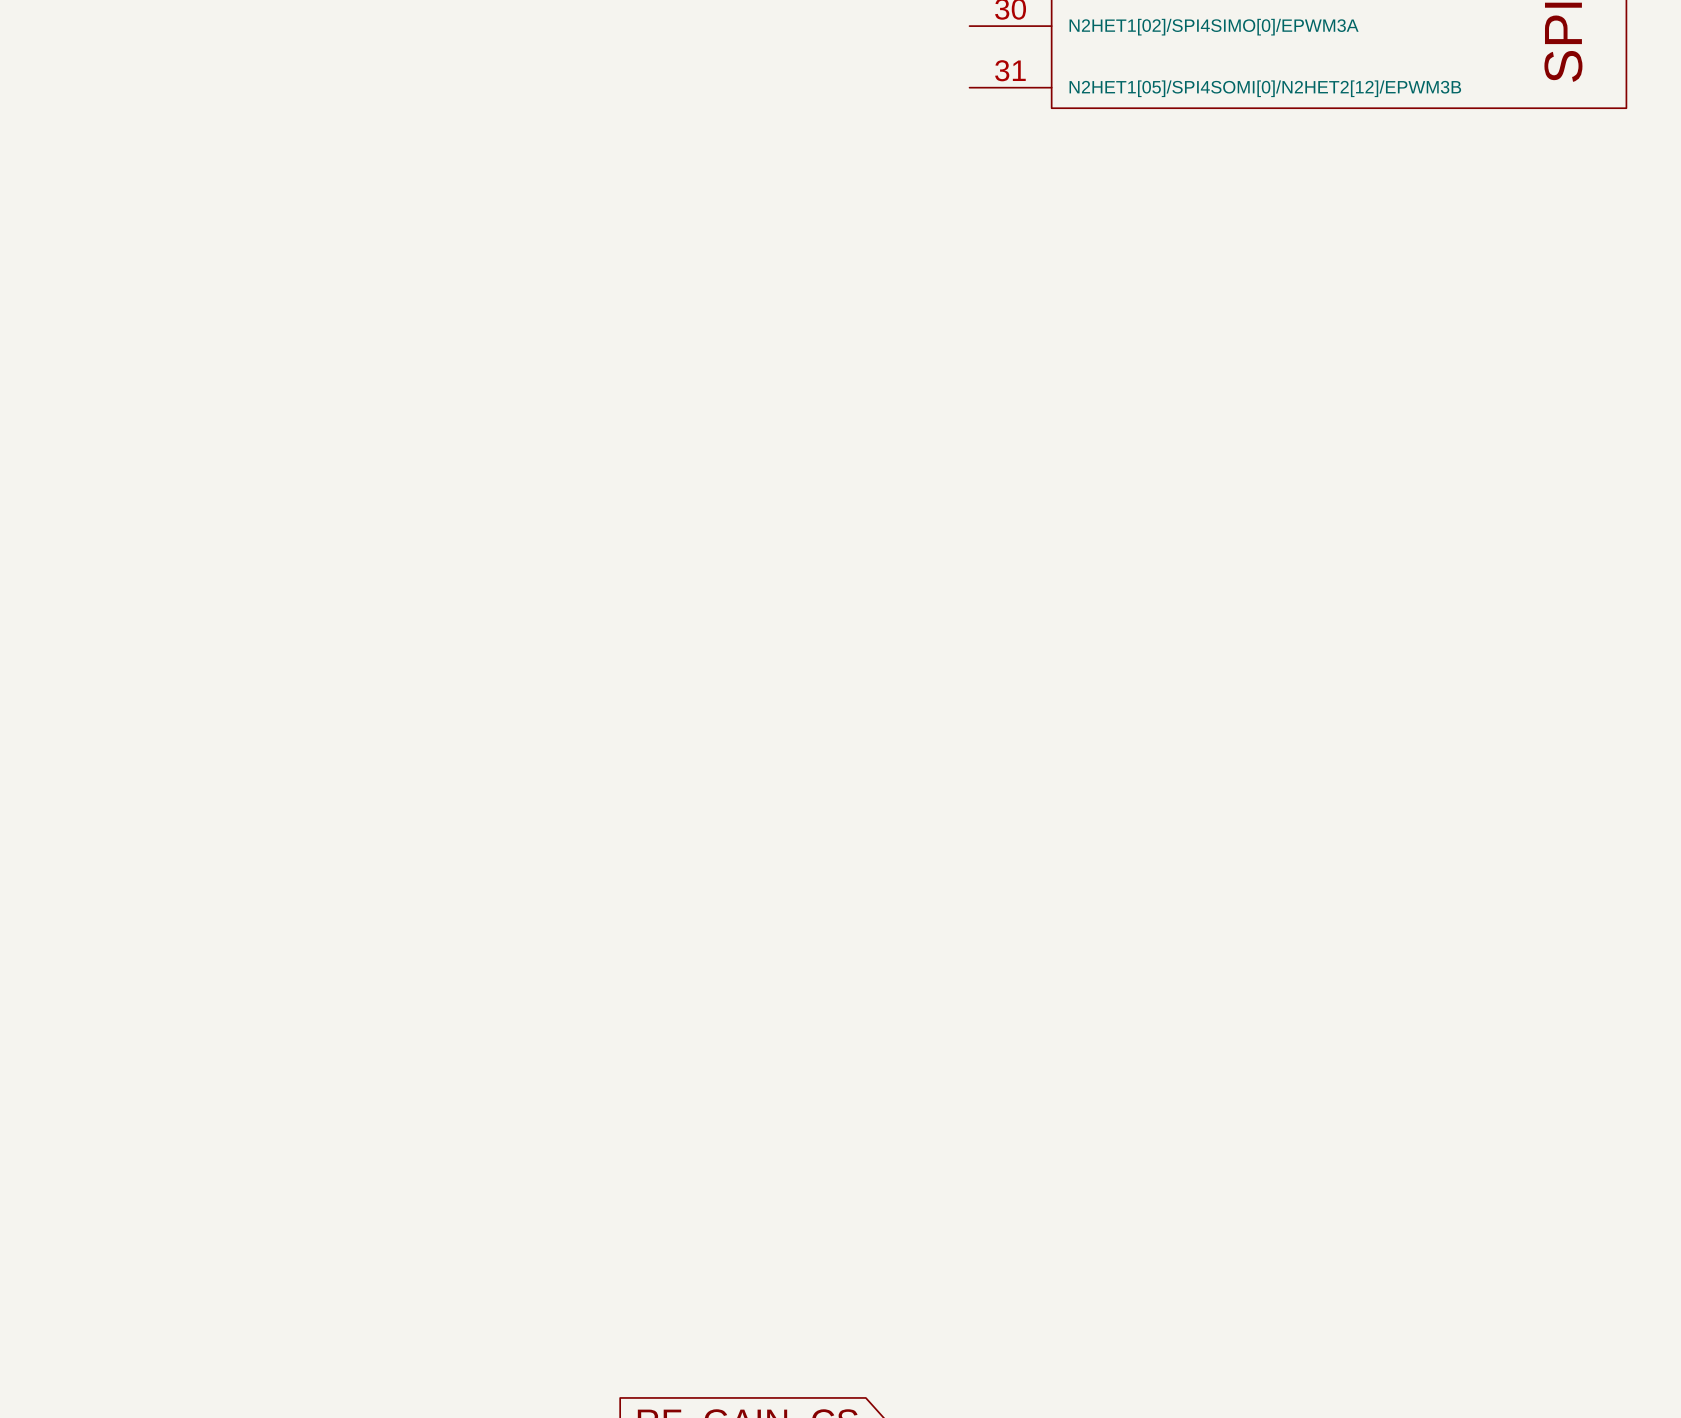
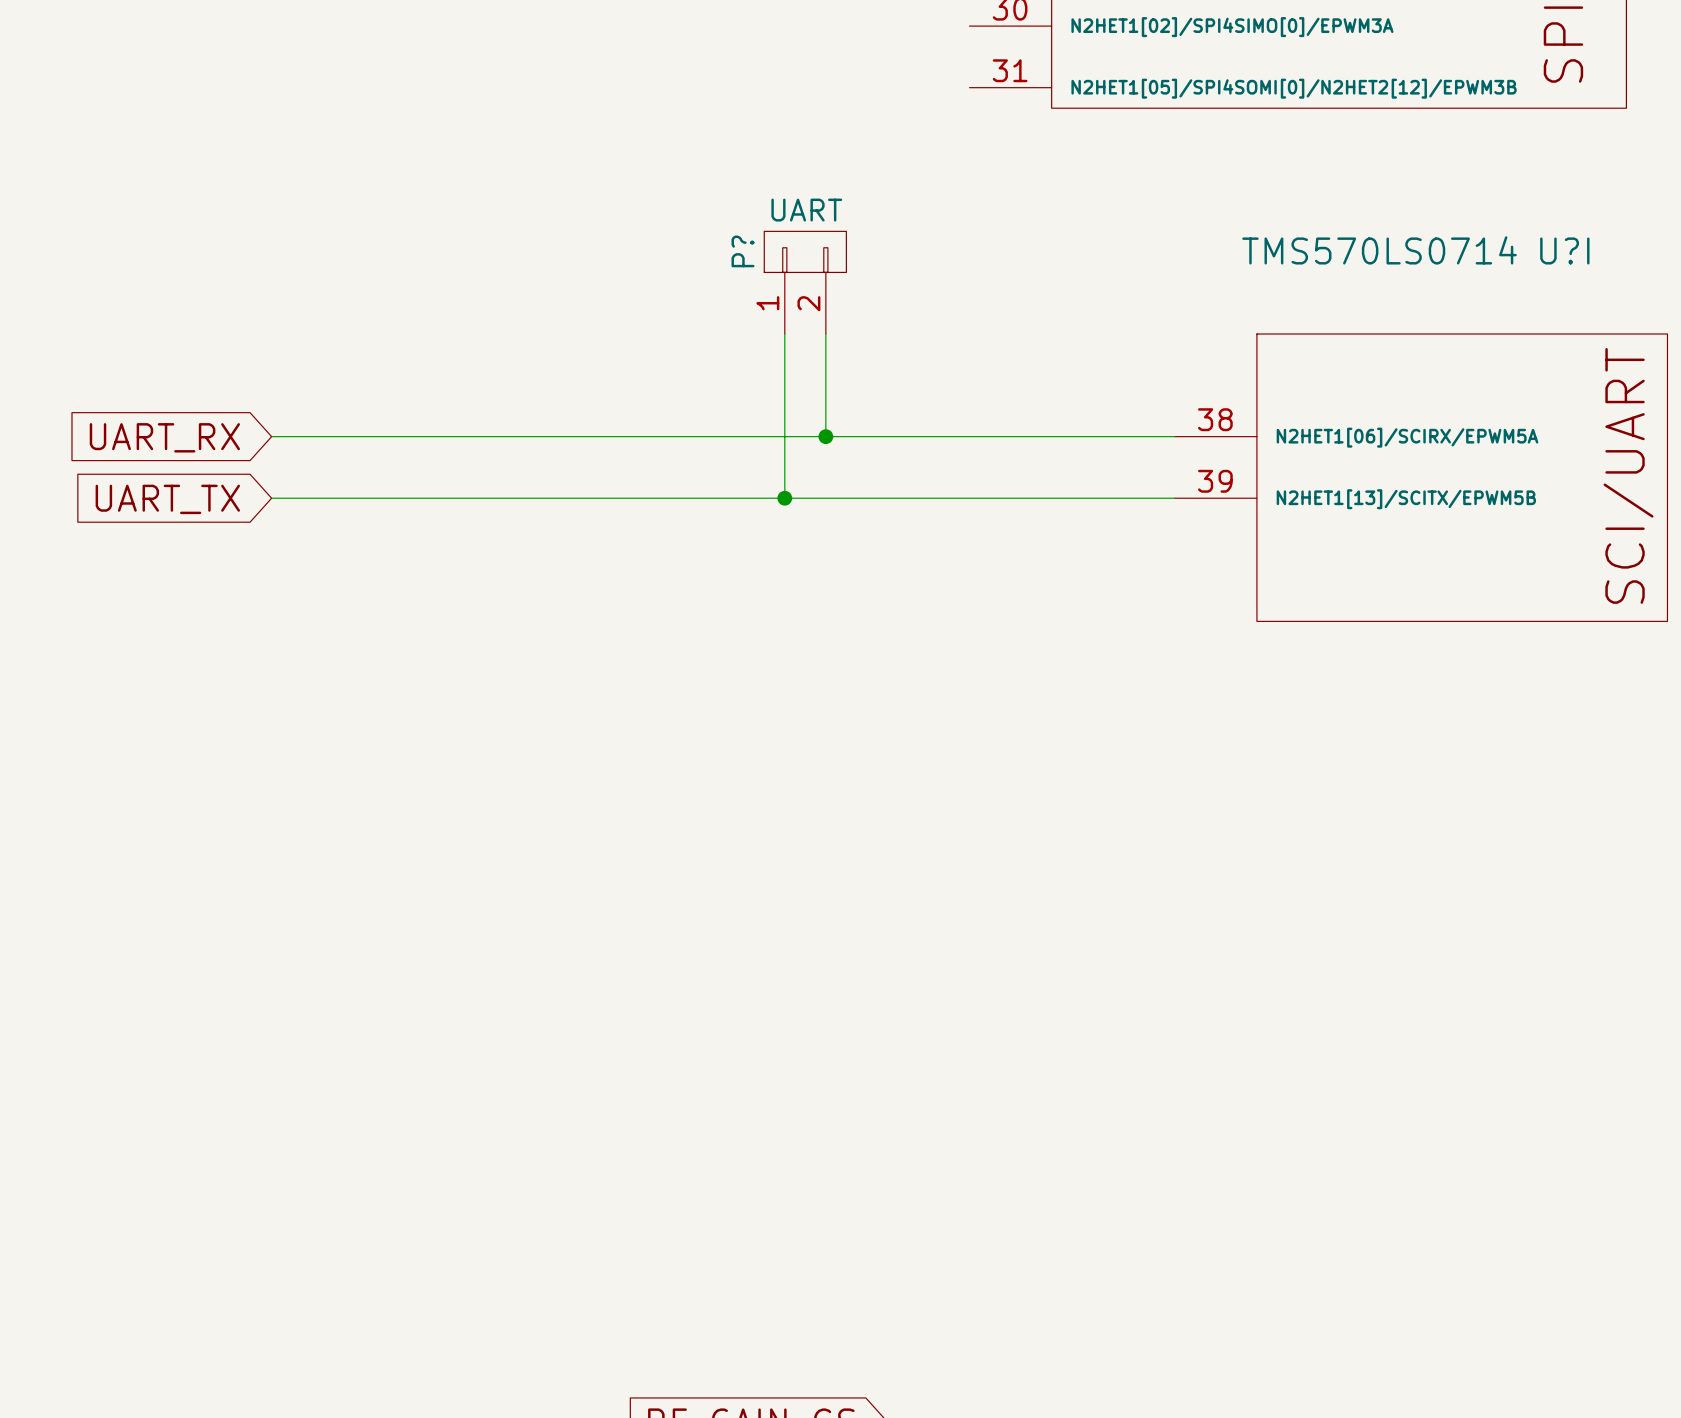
P?: none -> UART (805, 282)
wire: none -> (784, 334) (784, 498)
wire: none -> (825, 334) (825, 436)
wire: none -> (271, 436) (1174, 436)
junction: none -> (825, 436)
global label: none -> UART_RX (164, 437)
U?I: none -> TMS570LS0714 (1421, 477)
wire: none -> (271, 498) (1174, 498)
junction: none -> (784, 498)
global label: none -> UART_TX (167, 499)

